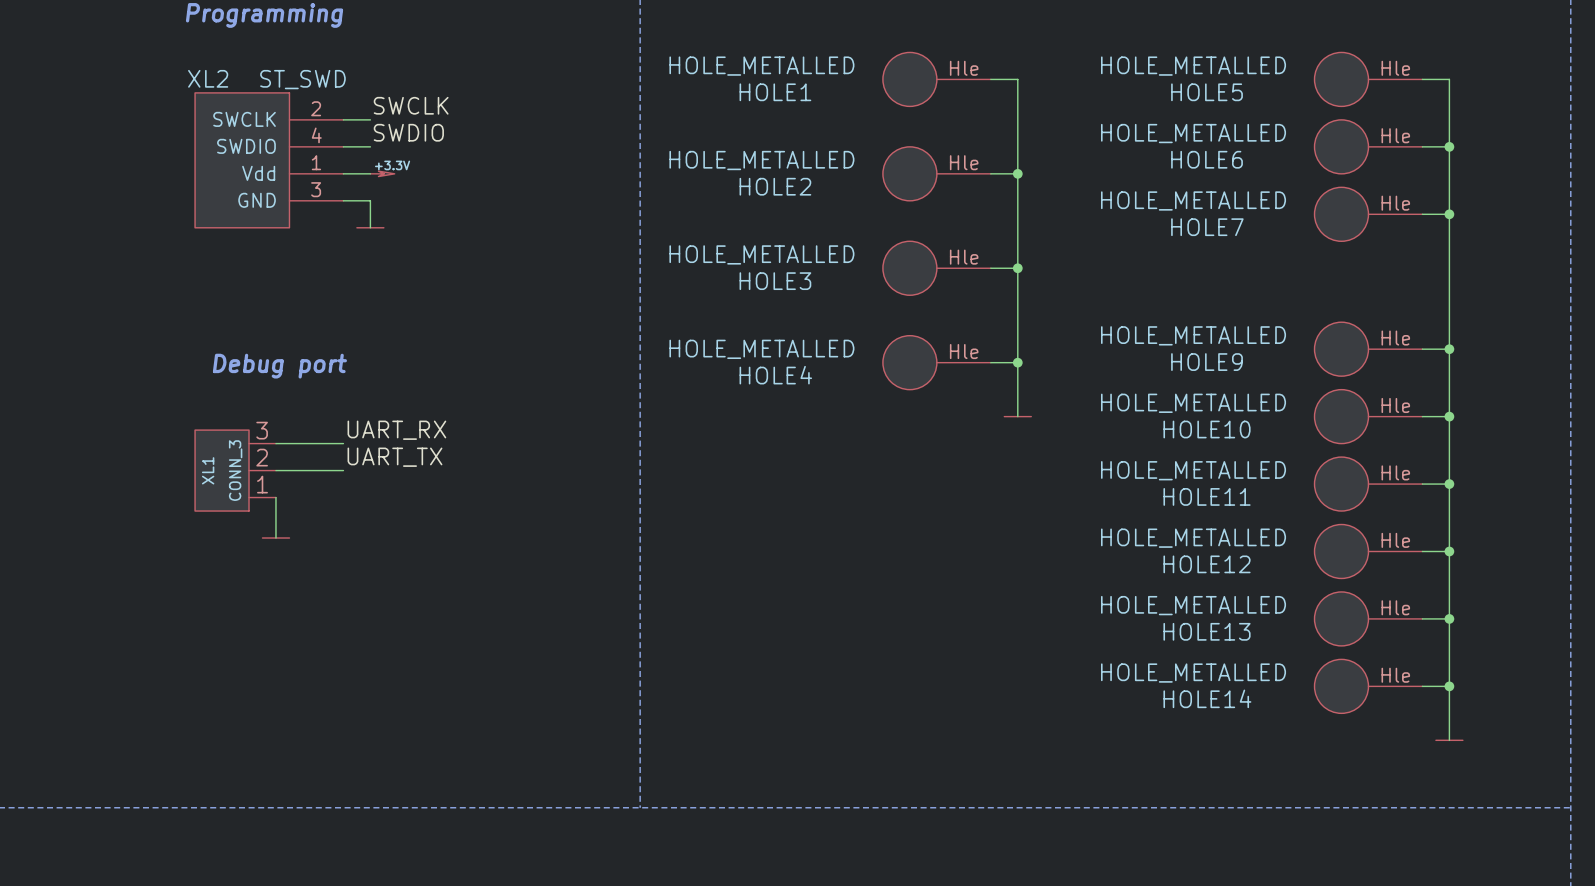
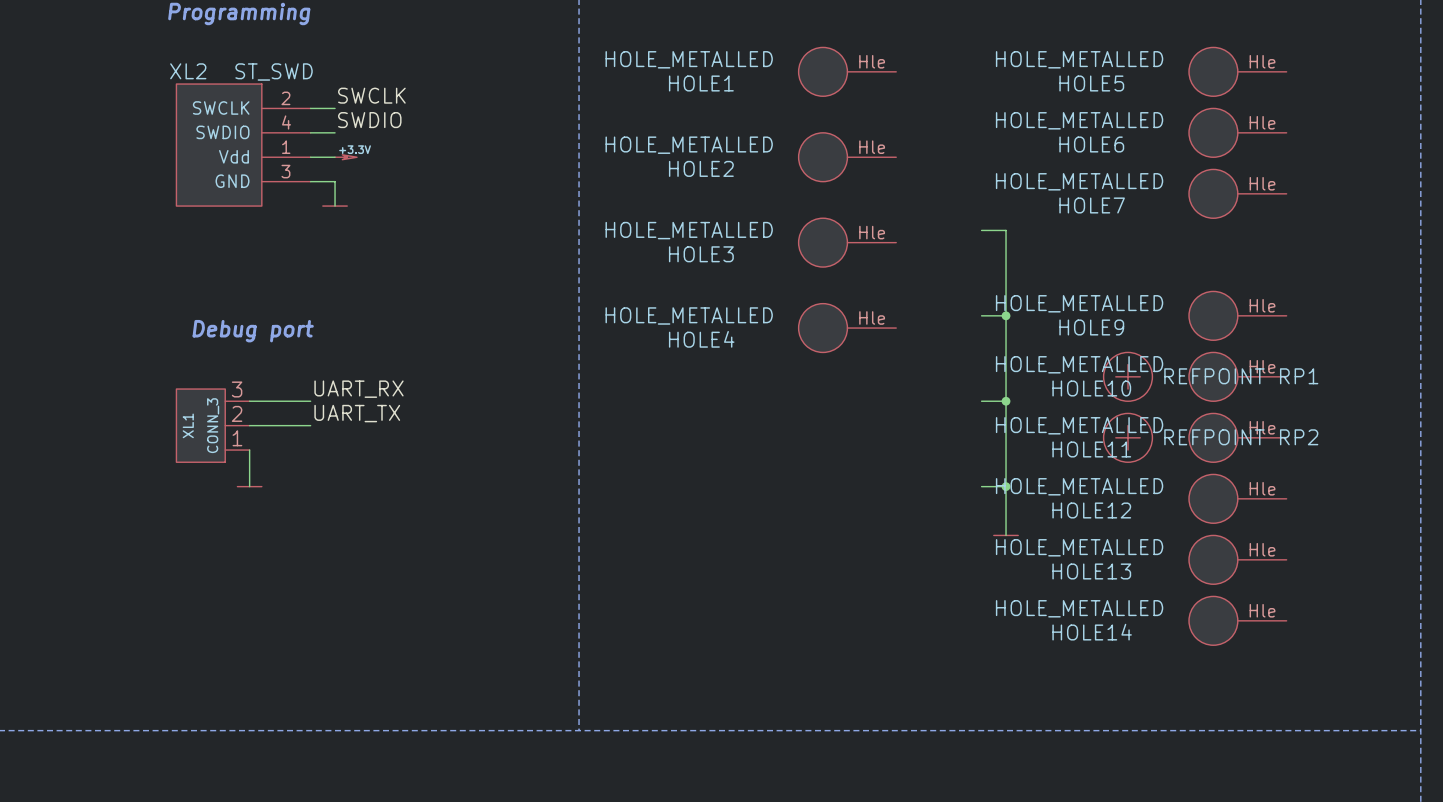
wire: (990, 79) (1017, 79) (1017, 416) -> (981, 230) (1006, 230) (1006, 535)
wire: (1422, 79) (1449, 79) (1449, 740) -> none
wire: (1422, 146) (1449, 146) -> none
junction: (1449, 146) -> none
wire: (990, 173) (1017, 173) -> (981, 315) (1006, 315)
junction: (1017, 173) -> none
wire: (1422, 214) (1449, 214) -> none
junction: (1449, 214) -> none
wire: (990, 268) (1017, 268) -> (981, 401) (1006, 401)
junction: (1017, 268) -> none
junction: none -> (1006, 315)
wire: (1422, 349) (1449, 349) -> none
junction: (1449, 349) -> none
wire: (990, 362) (1017, 362) -> (981, 486) (1006, 486)
junction: (1017, 362) -> none
power symbol: (1017, 416) -> none
RP1: none -> REFPOINT (1128, 376)
wire: (1422, 416) (1449, 416) -> none
junction: (1449, 416) -> none
junction: none -> (1006, 401)
RP2: none -> REFPOINT (1128, 437)
wire: (1422, 484) (1449, 484) -> none
junction: (1449, 484) -> none
junction: none -> (1006, 486)
wire: (1422, 551) (1449, 551) -> none
junction: (1449, 551) -> none
power symbol: none -> (1006, 535)
wire: (1422, 618) (1449, 618) -> none
junction: (1449, 618) -> none
wire: (1422, 686) (1449, 686) -> none
junction: (1449, 686) -> none
power symbol: (1449, 740) -> none

